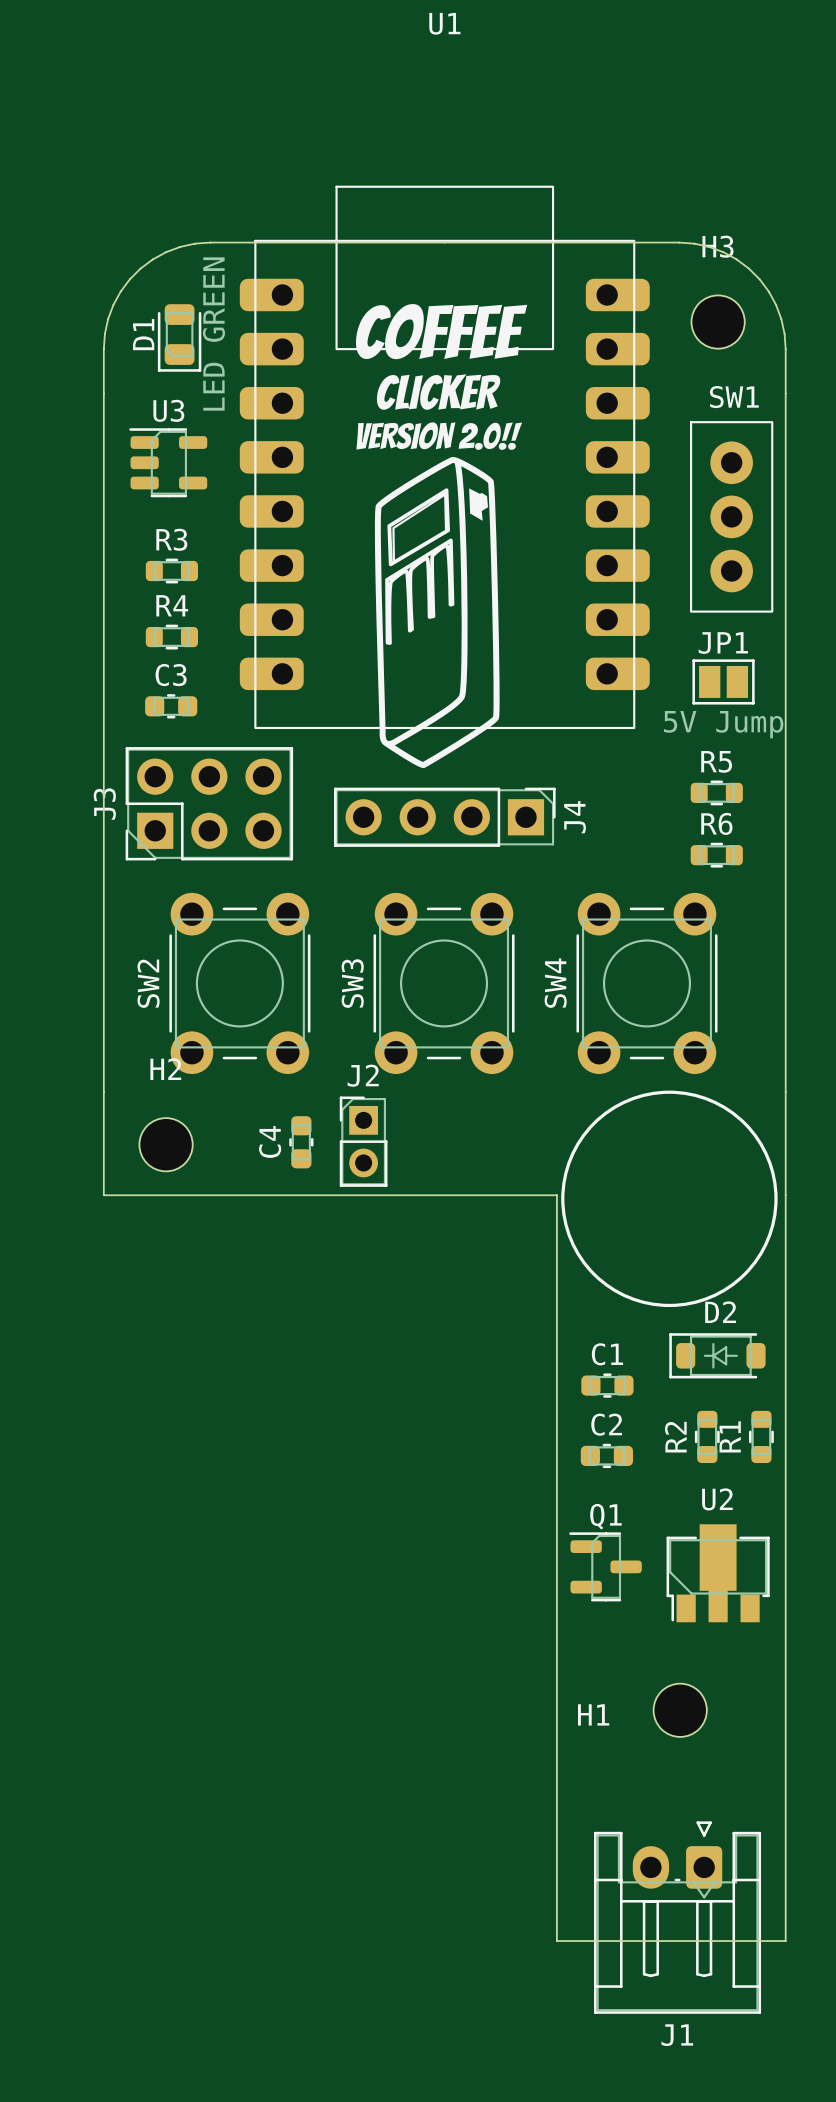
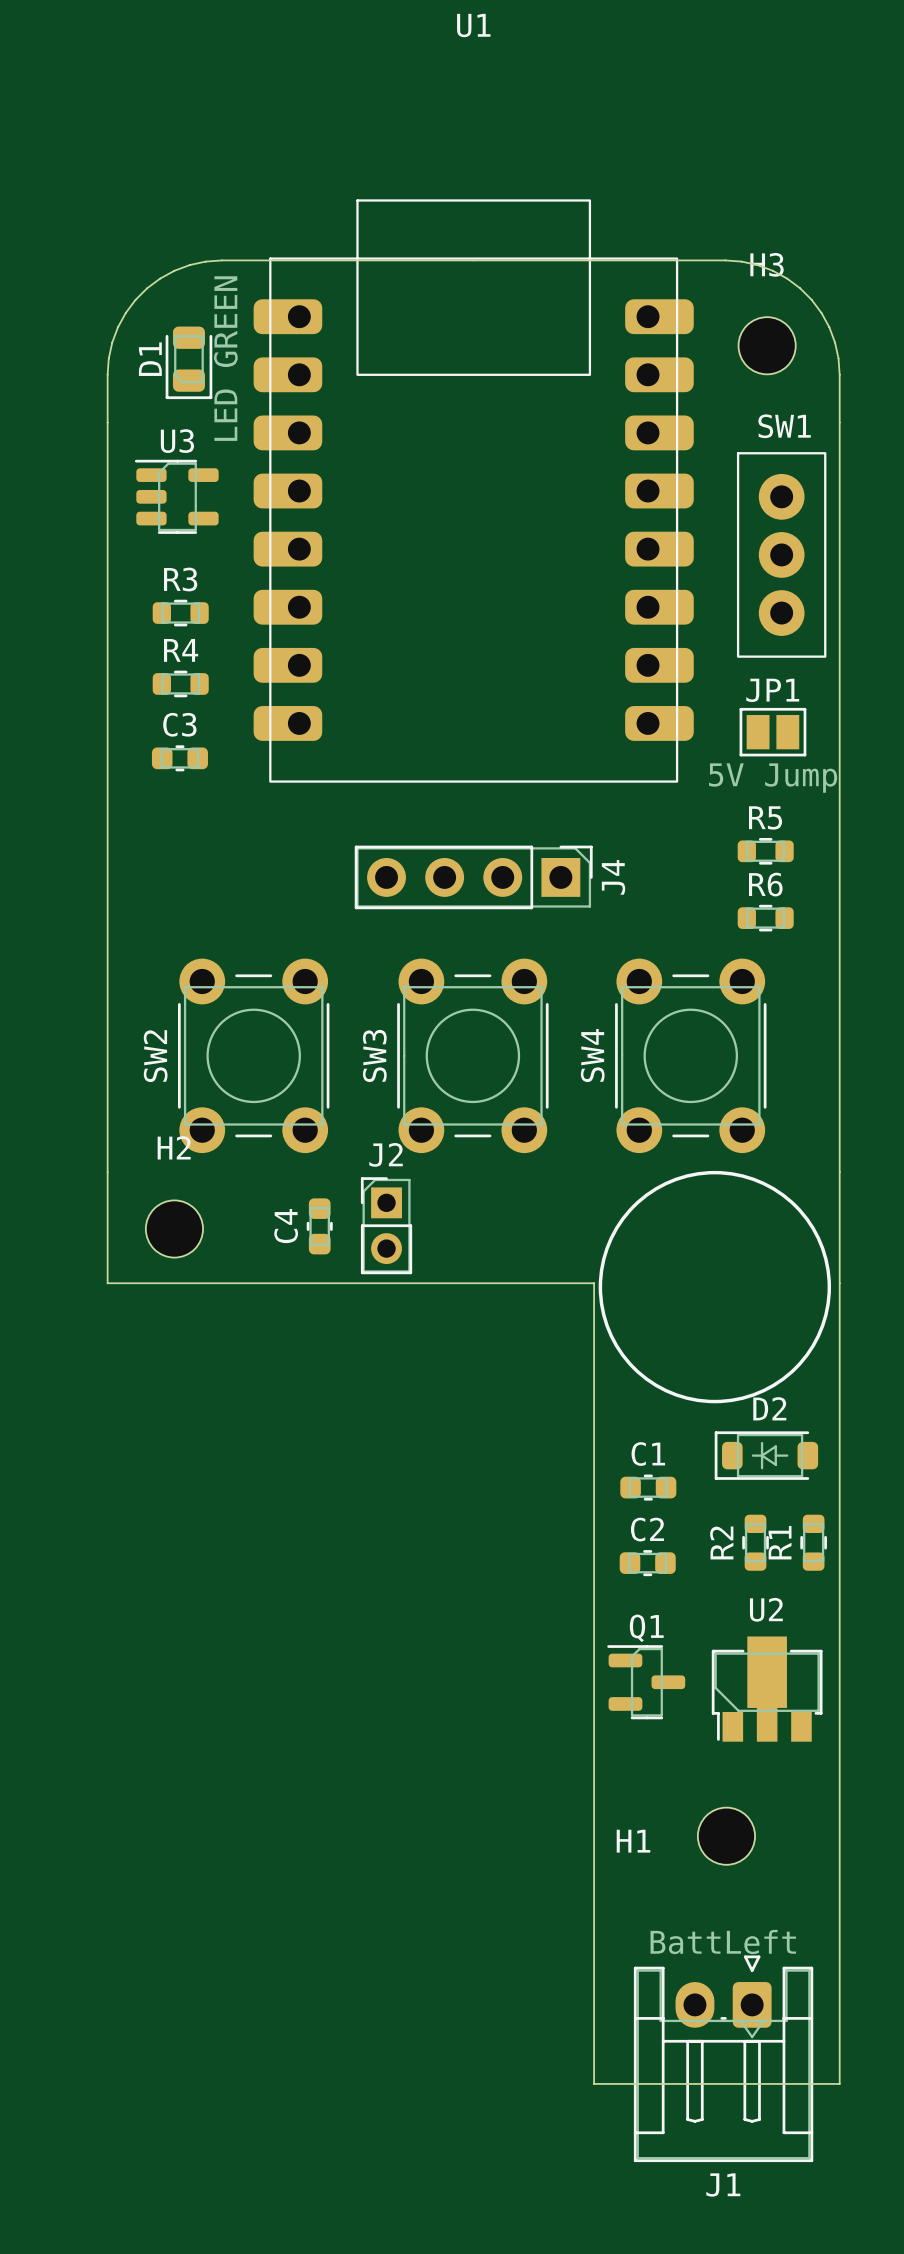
drawing: [356, 304, 528, 769] -> none
J3: (209, 803) -> none
J1 value: none -> BattLeft (723, 1942)

